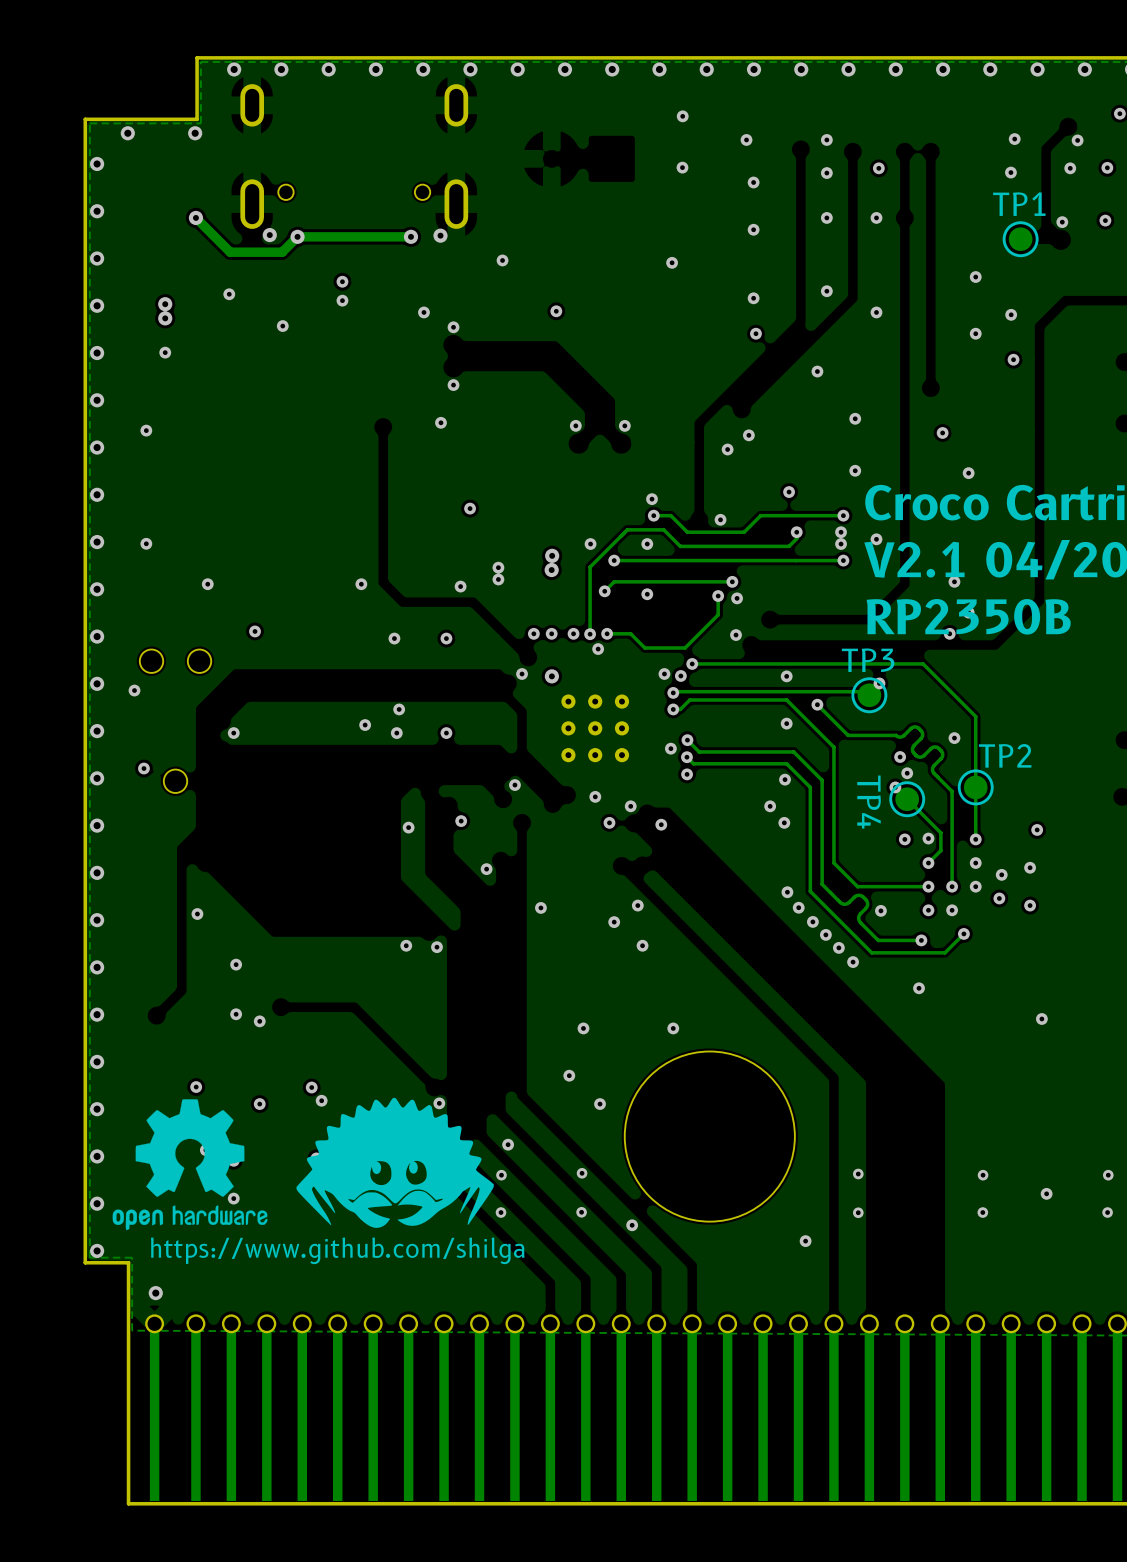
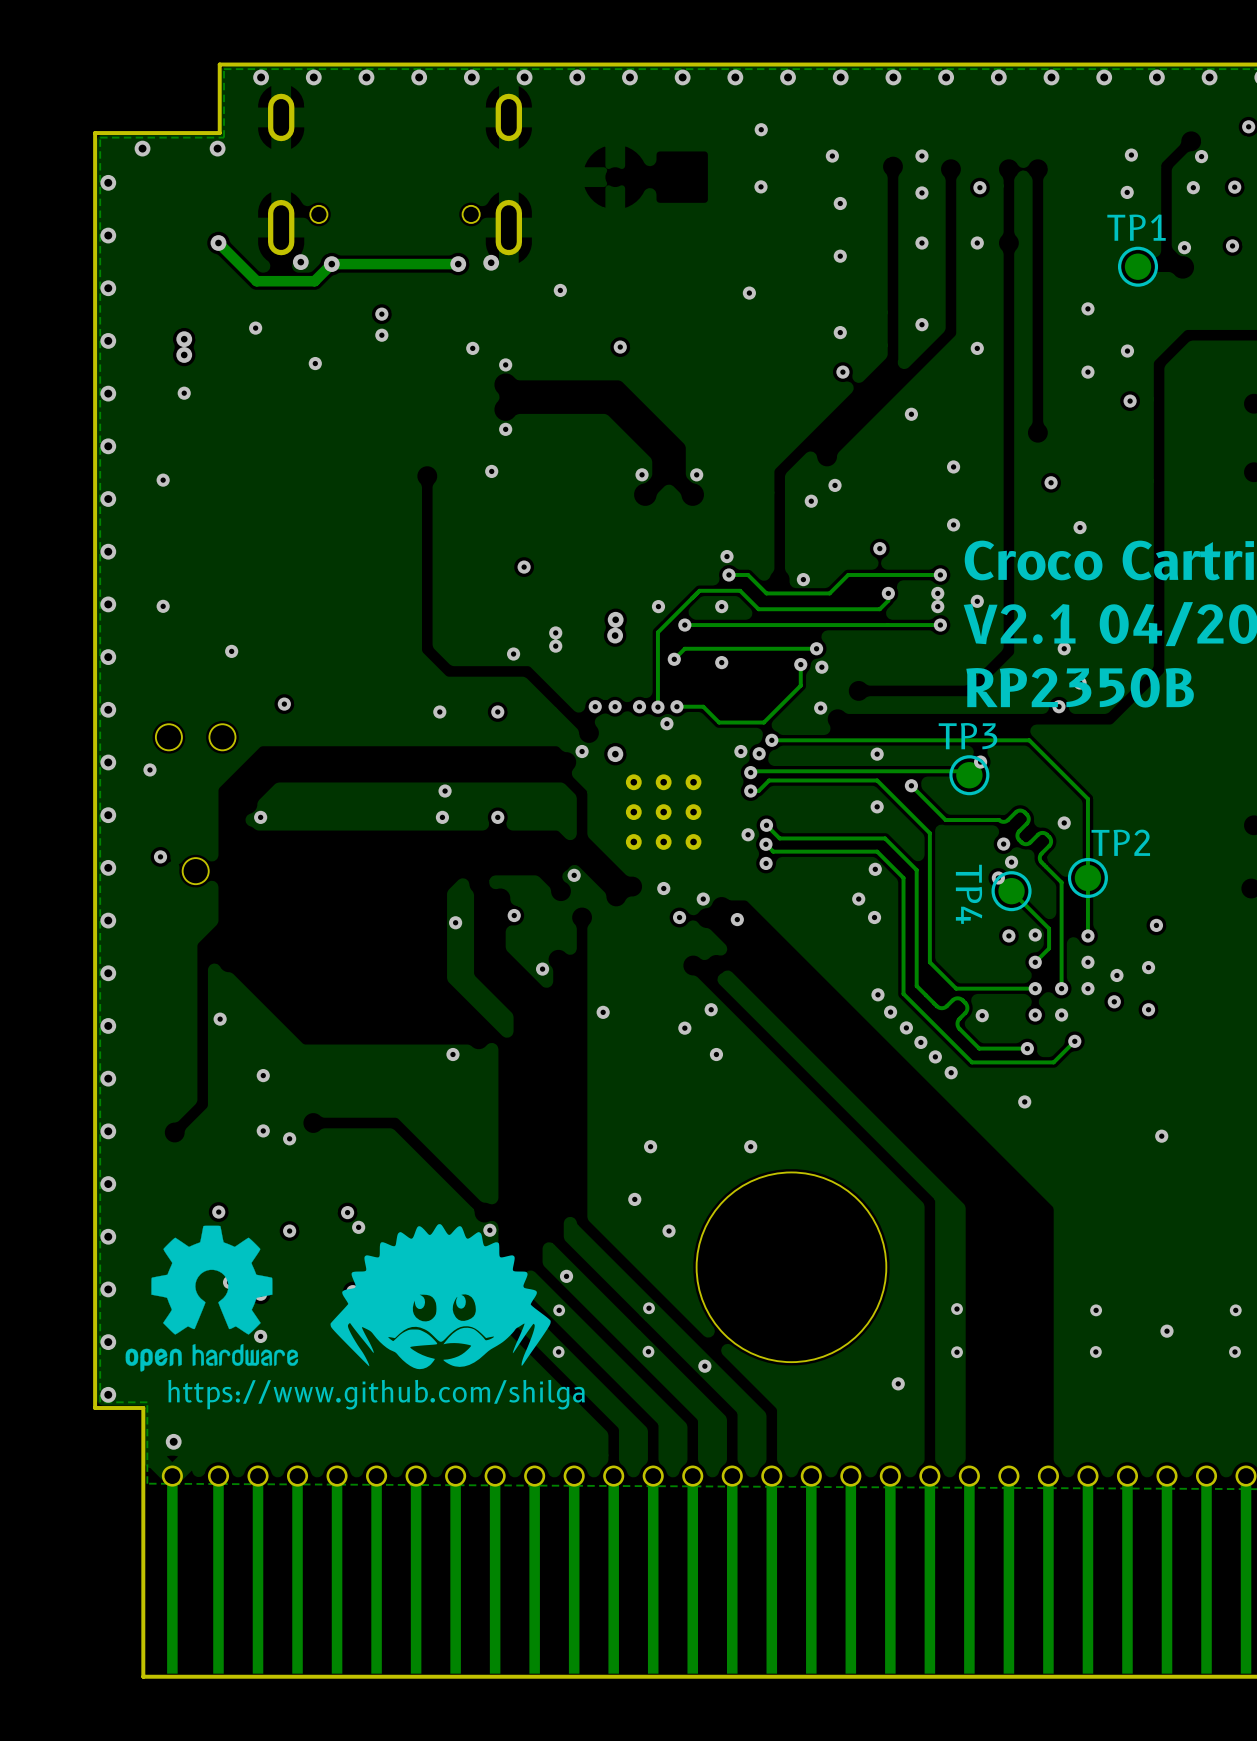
via: (361, 584) -> none
via: (365, 725) -> none
via: (436, 947) -> none

